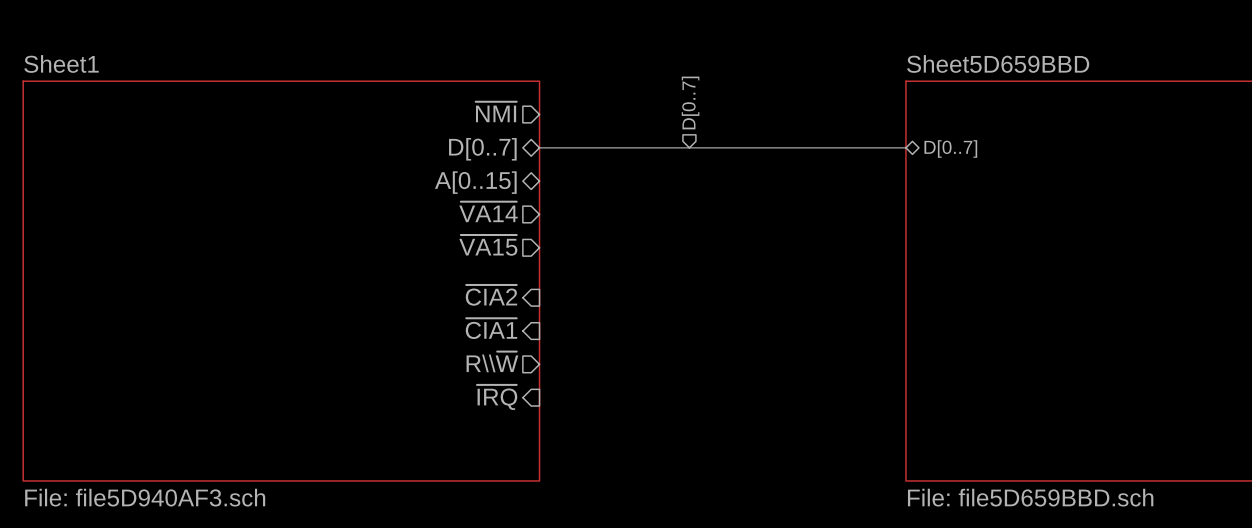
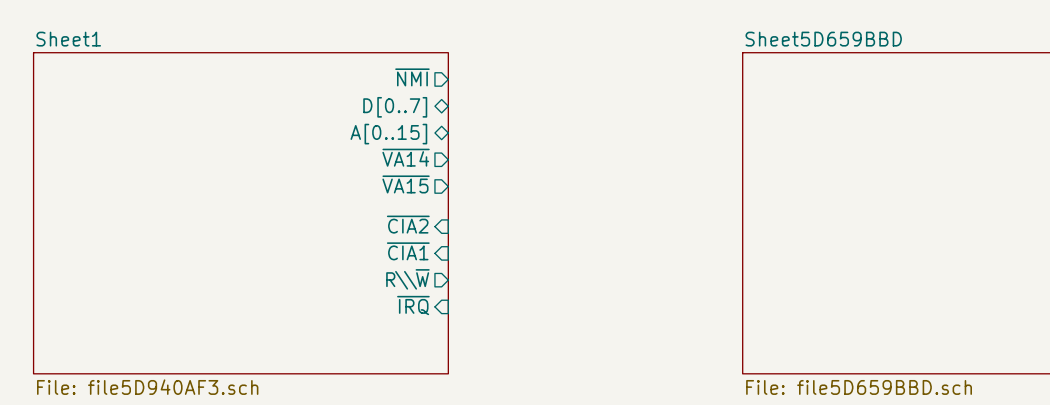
hierarchical label: D[0..7] (690, 102) -> none
bus: (539, 147) (905, 147) -> none
sheet pin: D[0..7] (950, 148) -> none

